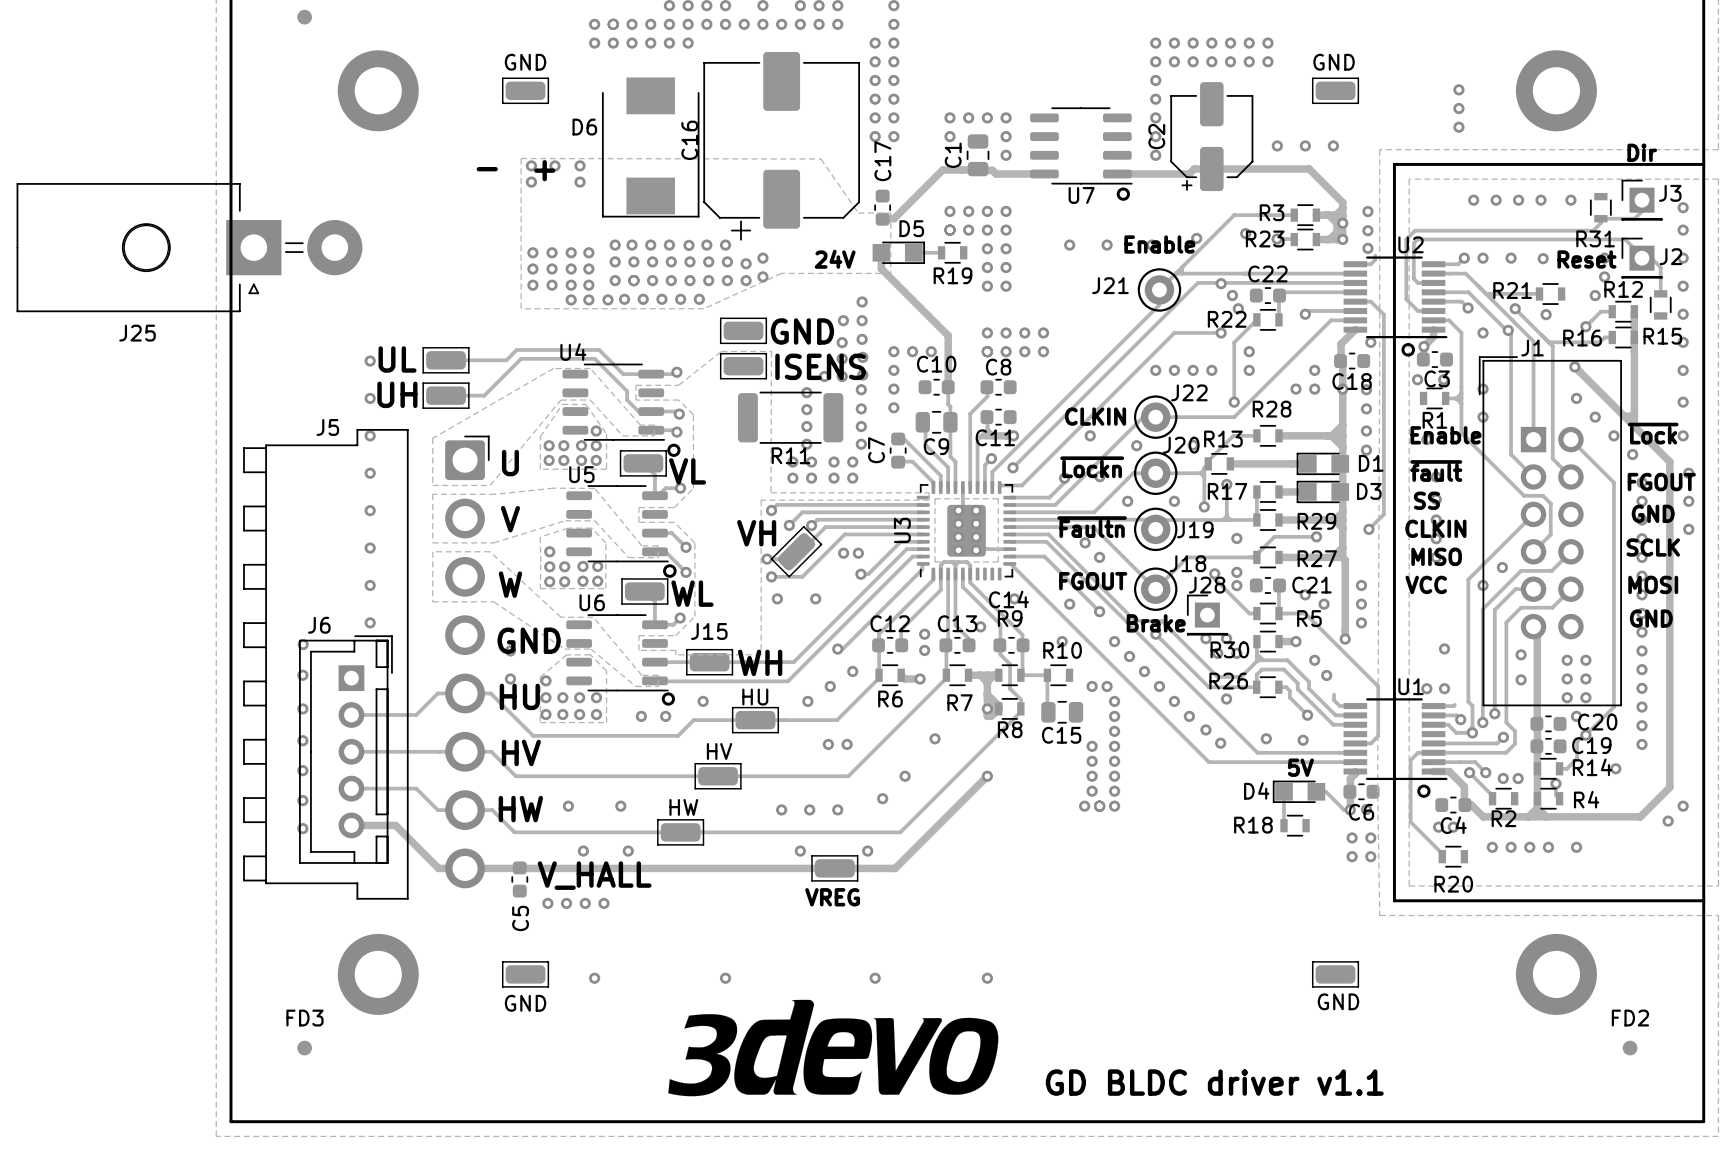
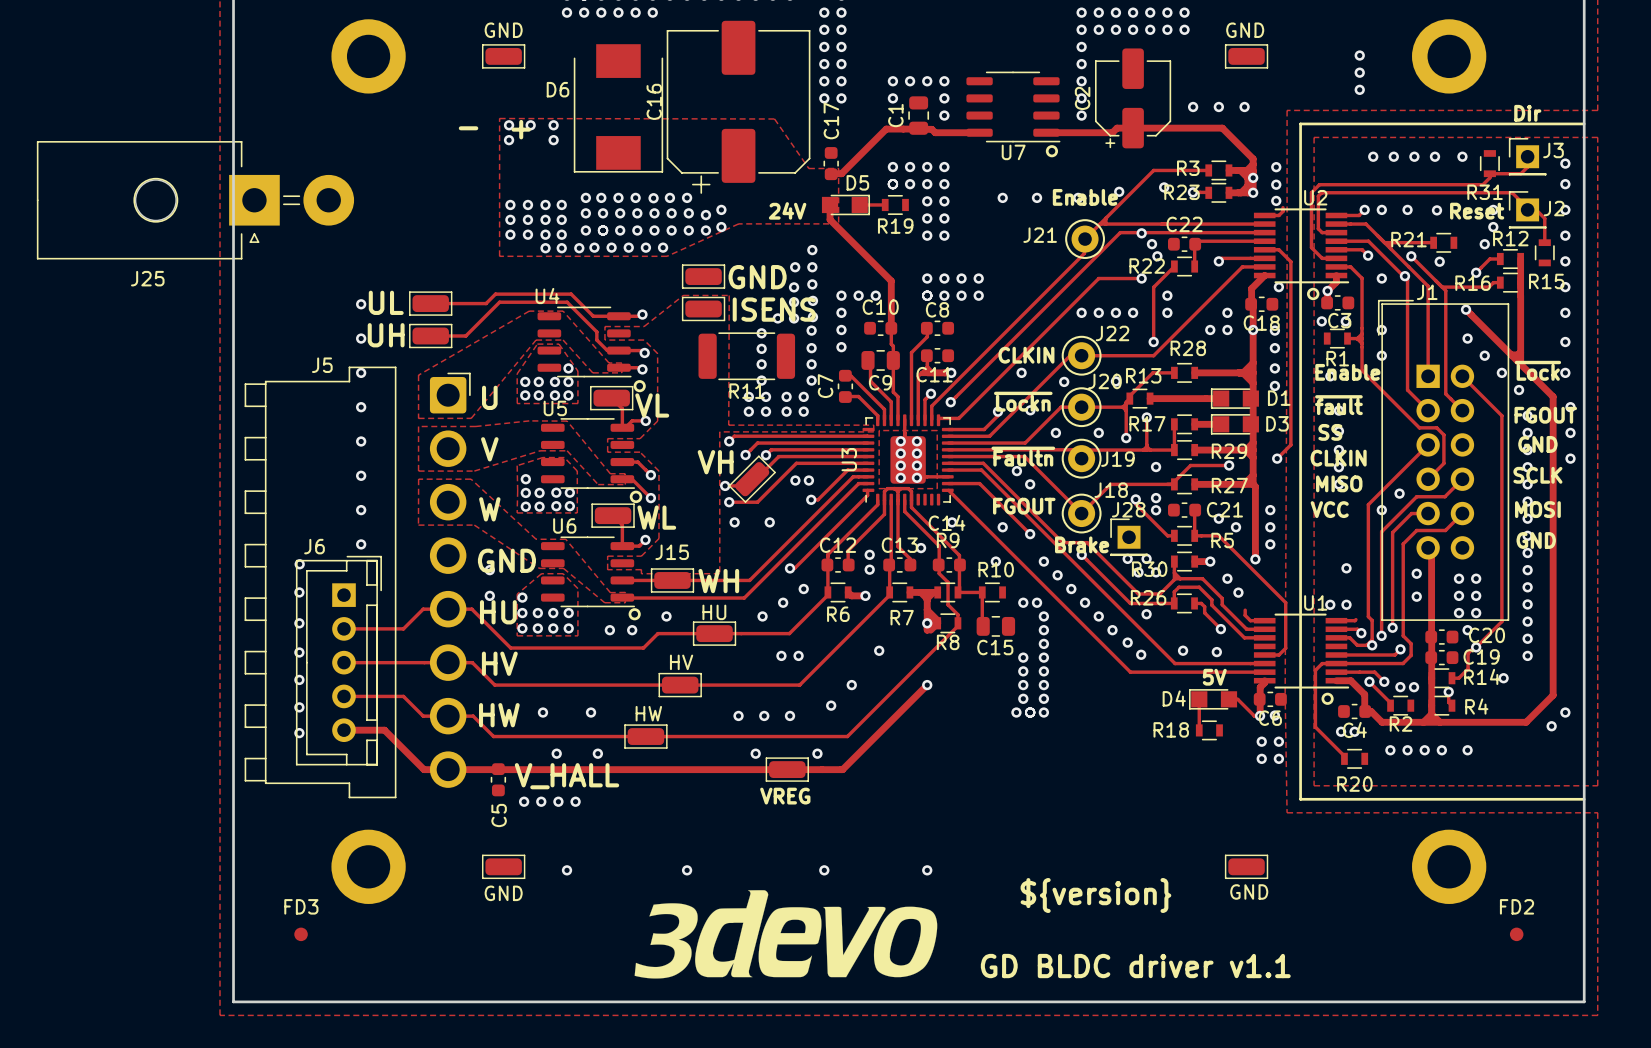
text: none -> ${version} (1095, 895)

